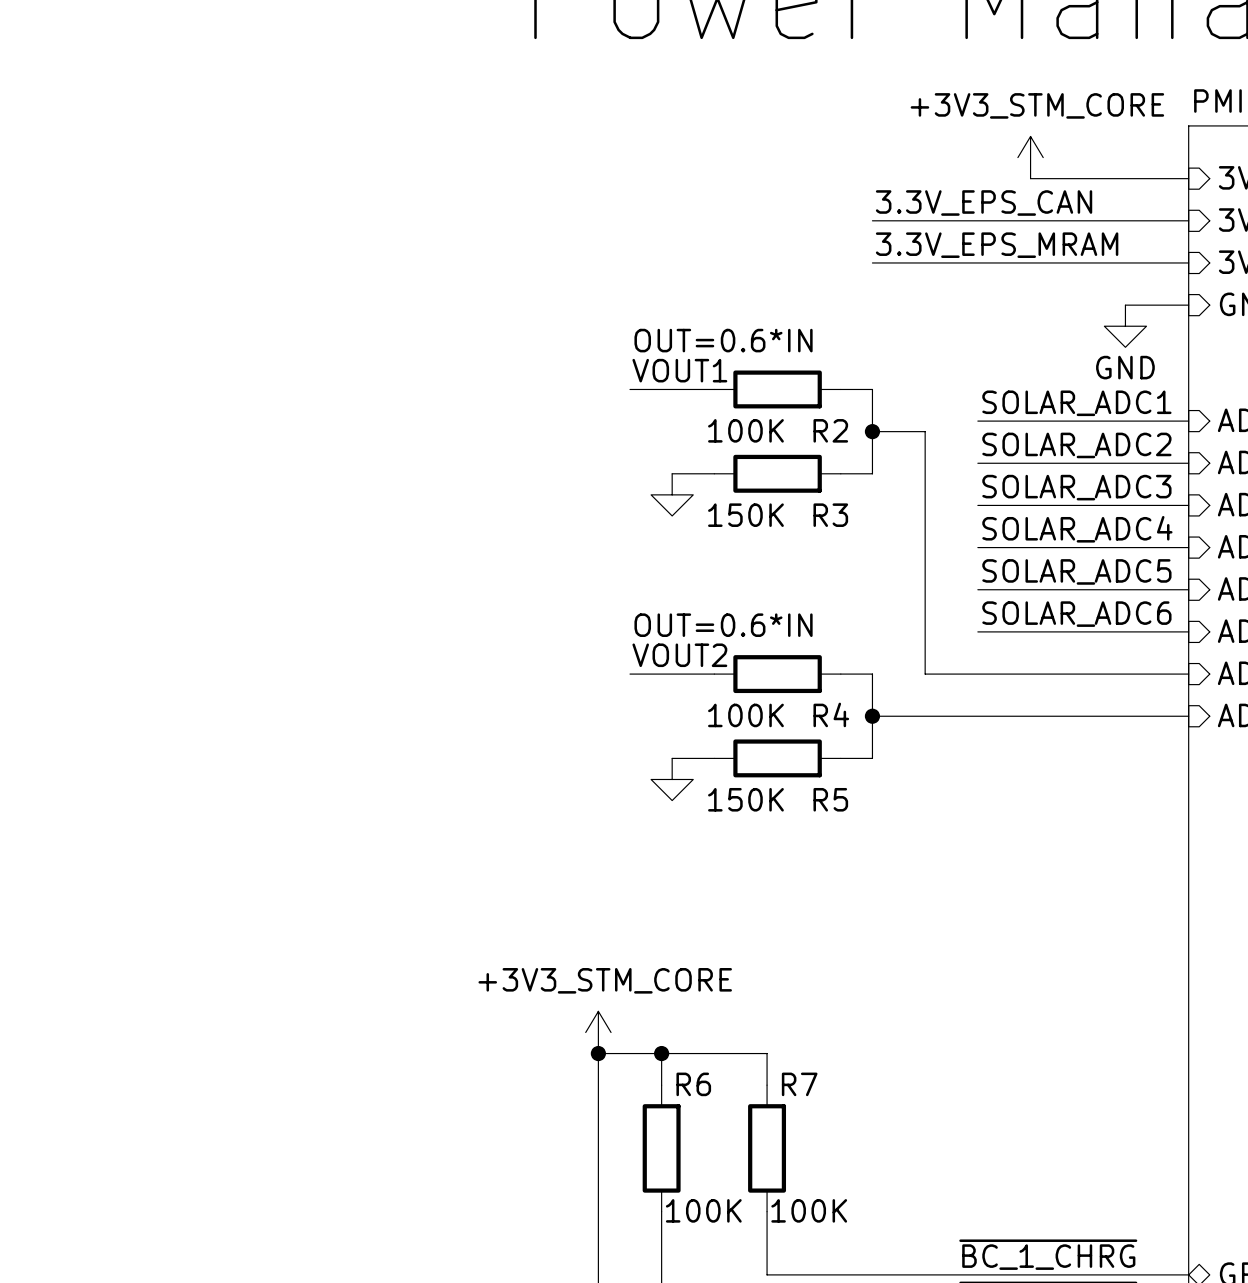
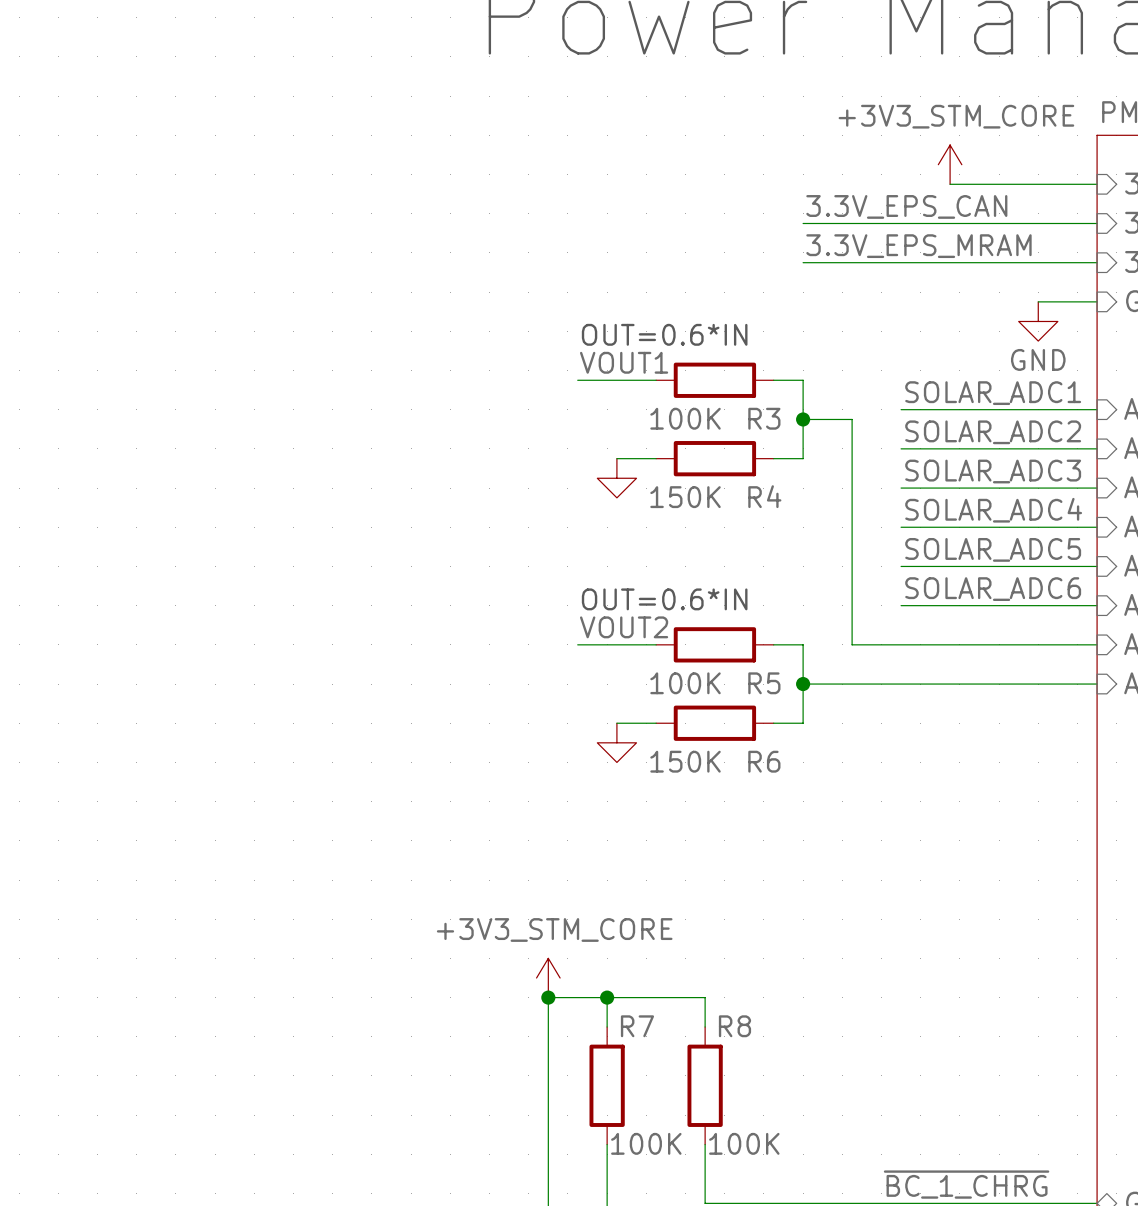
R2 name: R2 (830, 430) -> R3 (764, 418)
R3 name: R3 (830, 515) -> R4 (764, 496)
R4 name: R4 (831, 714) -> R5 (764, 683)
R5 name: R5 (830, 799) -> R6 (764, 761)
R6 name: R6 (693, 1084) -> R7 (637, 1026)
R7 name: R7 (799, 1084) -> R8 (734, 1026)

